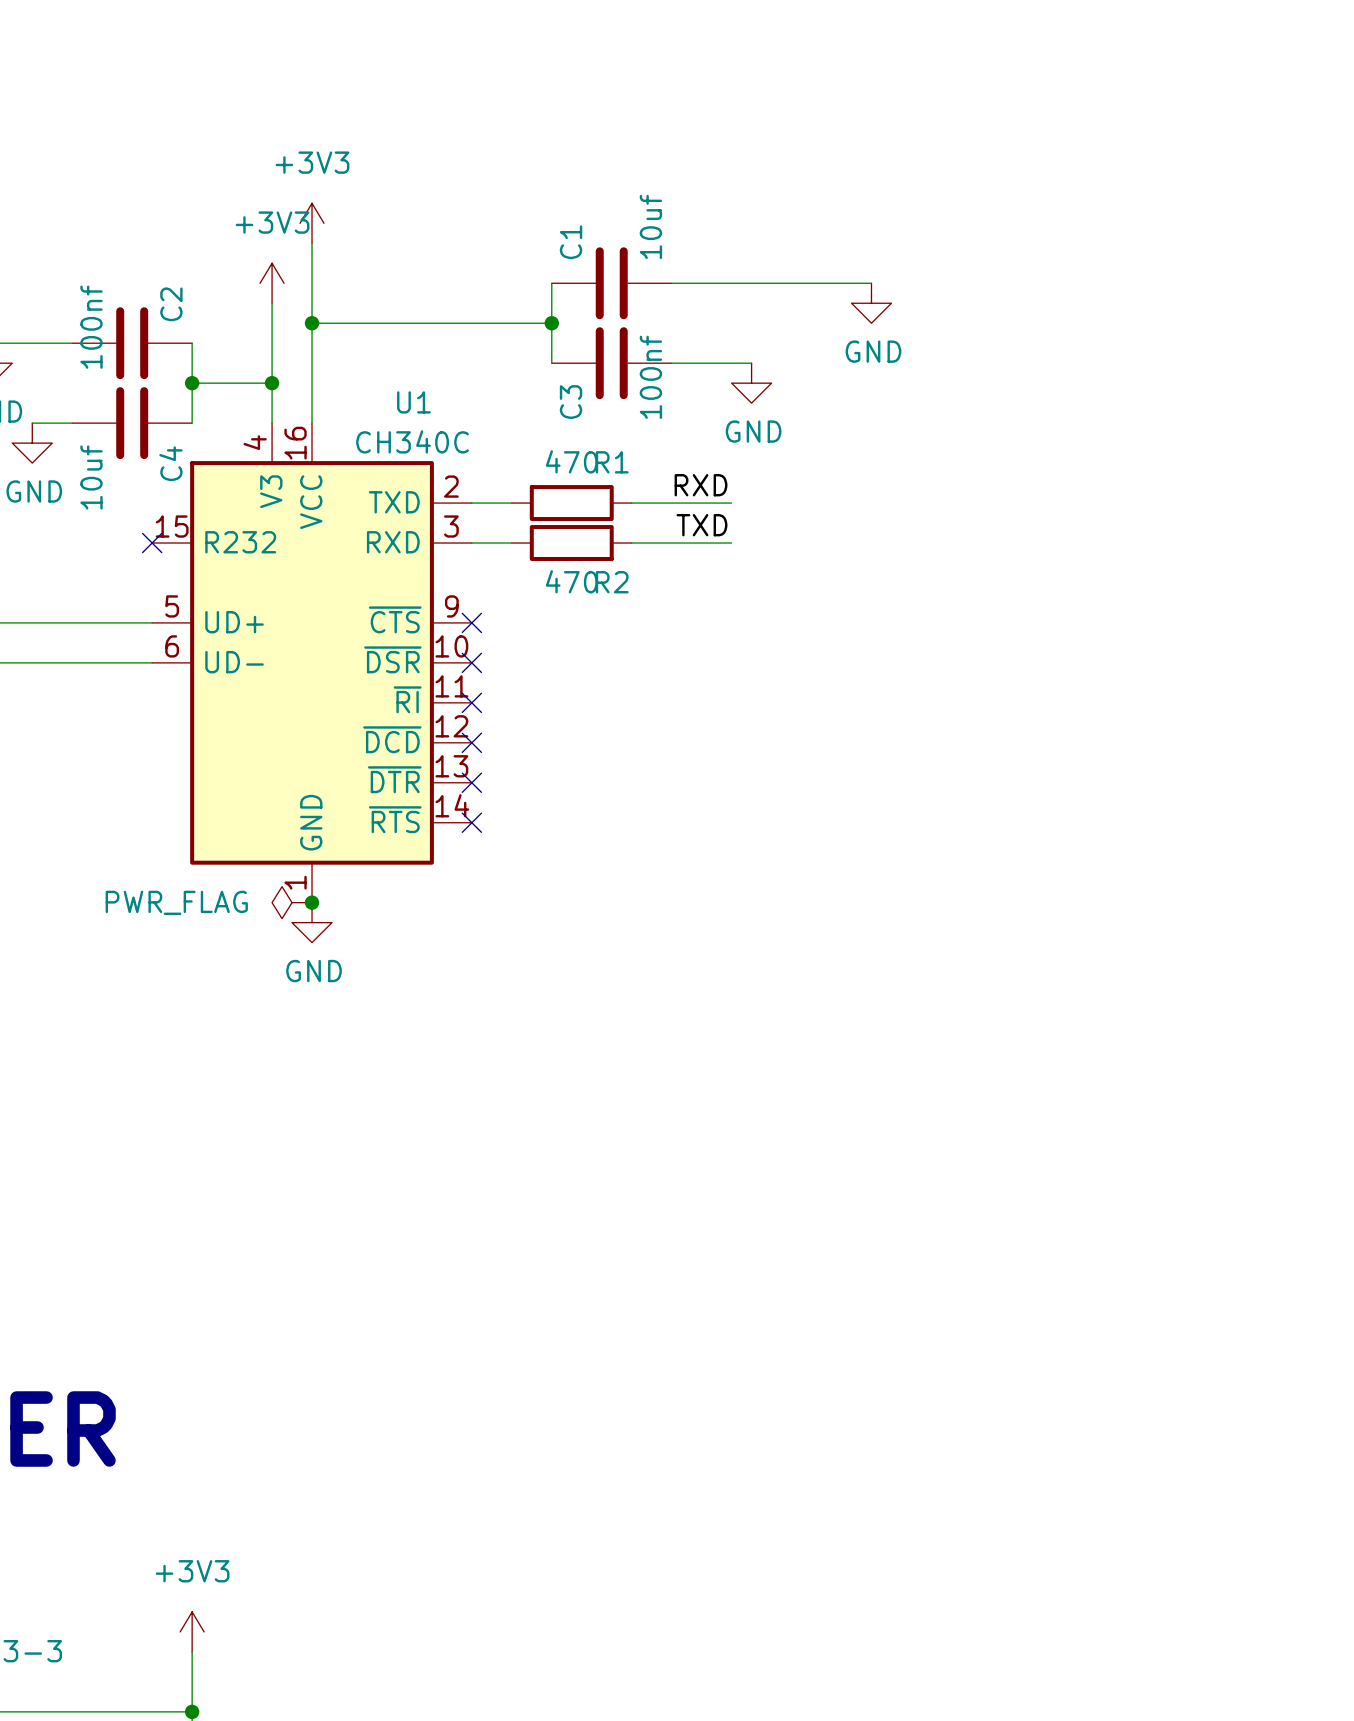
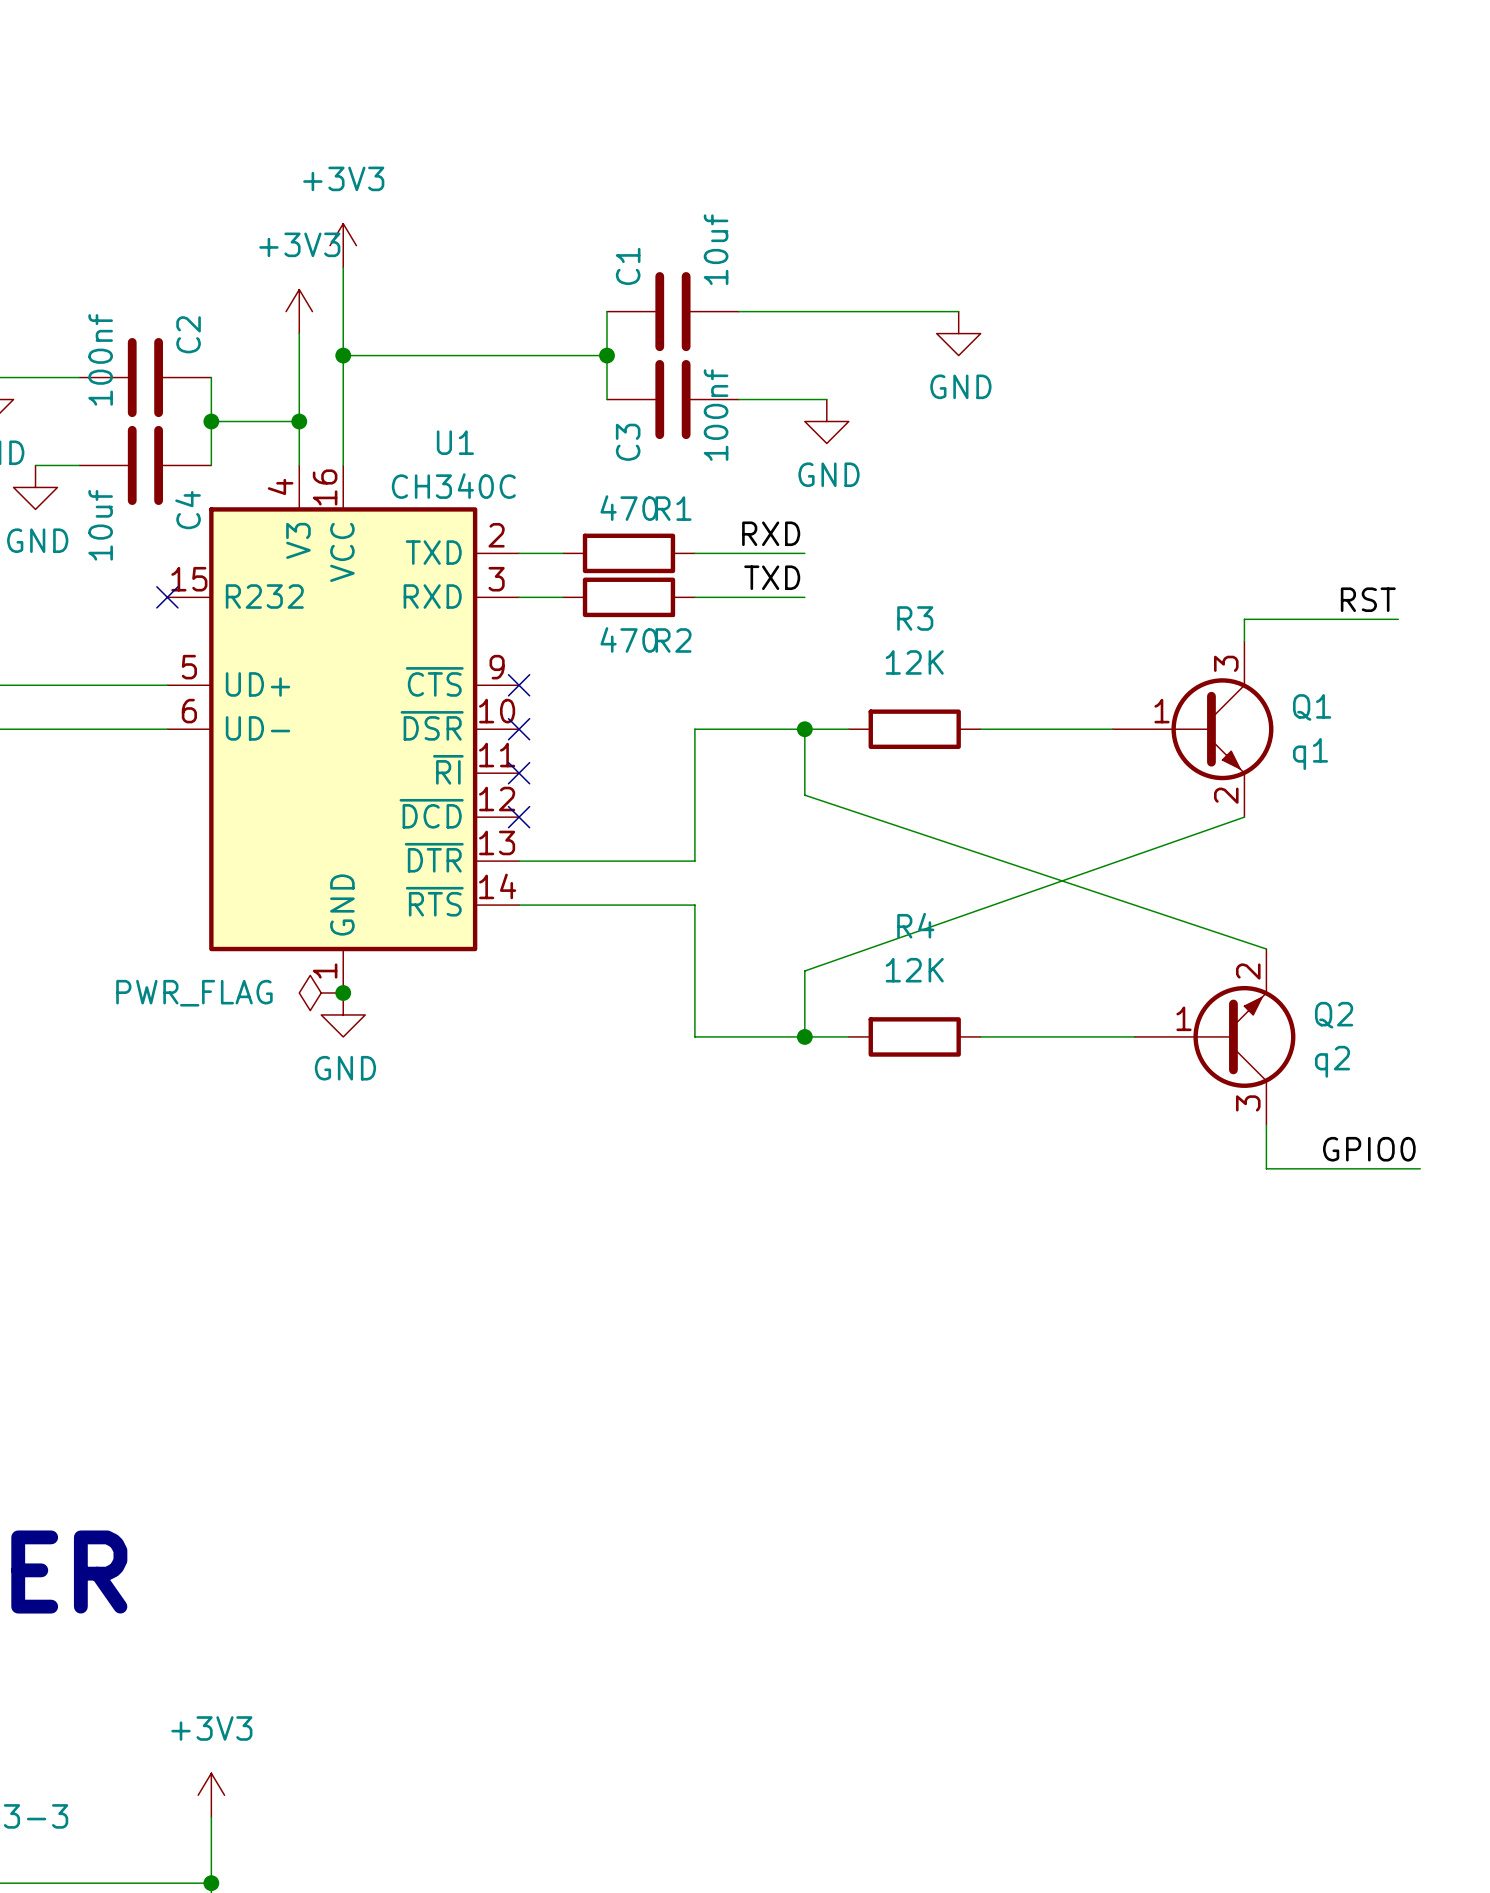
label: none -> RST (1368, 599)
wire: none -> (1398, 619) (1244, 619) (1244, 641)
wire: none -> (804, 729) (804, 795) (1266, 949)
junction: none -> (804, 729)
wire: none -> (848, 729) (694, 729) (694, 861) (519, 861)
R3: none -> 12K (914, 729)
wire: none -> (980, 729) (1112, 729)
Q1: none -> q1 (1192, 729)
wire: none -> (1244, 817) (804, 971) (804, 1036)
no-connect mark: (471, 782) -> none
wire: none -> (519, 905) (694, 905) (694, 1036) (848, 1036)
no-connect mark: (471, 822) -> none
junction: none -> (804, 1036)
R4: none -> 12K (914, 1036)
wire: none -> (980, 1036) (1134, 1036)
Q2: none -> q2 (1214, 1036)
wire: none -> (1266, 1124) (1266, 1168) (1420, 1168)
label: none -> GPIO0 (1369, 1149)

